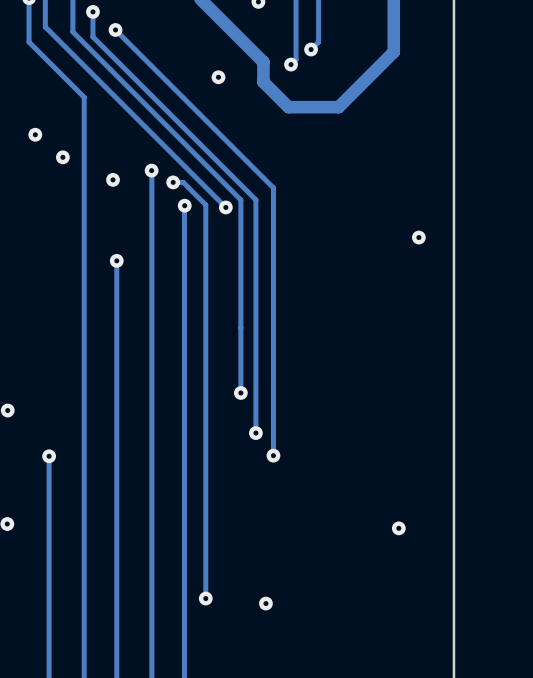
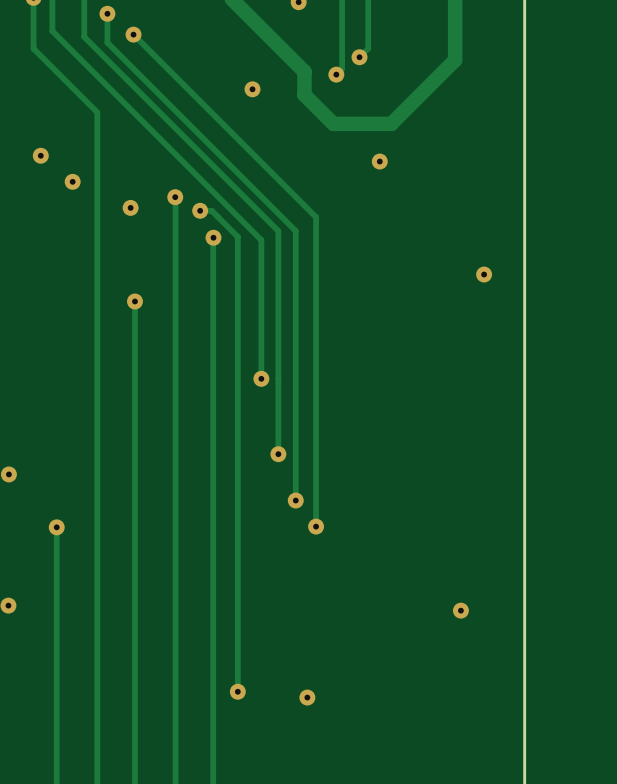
via: none -> (379, 161)
via: (225, 207) -> none
track: none -> (261, 240) (261, 378)
via: none -> (261, 378)

